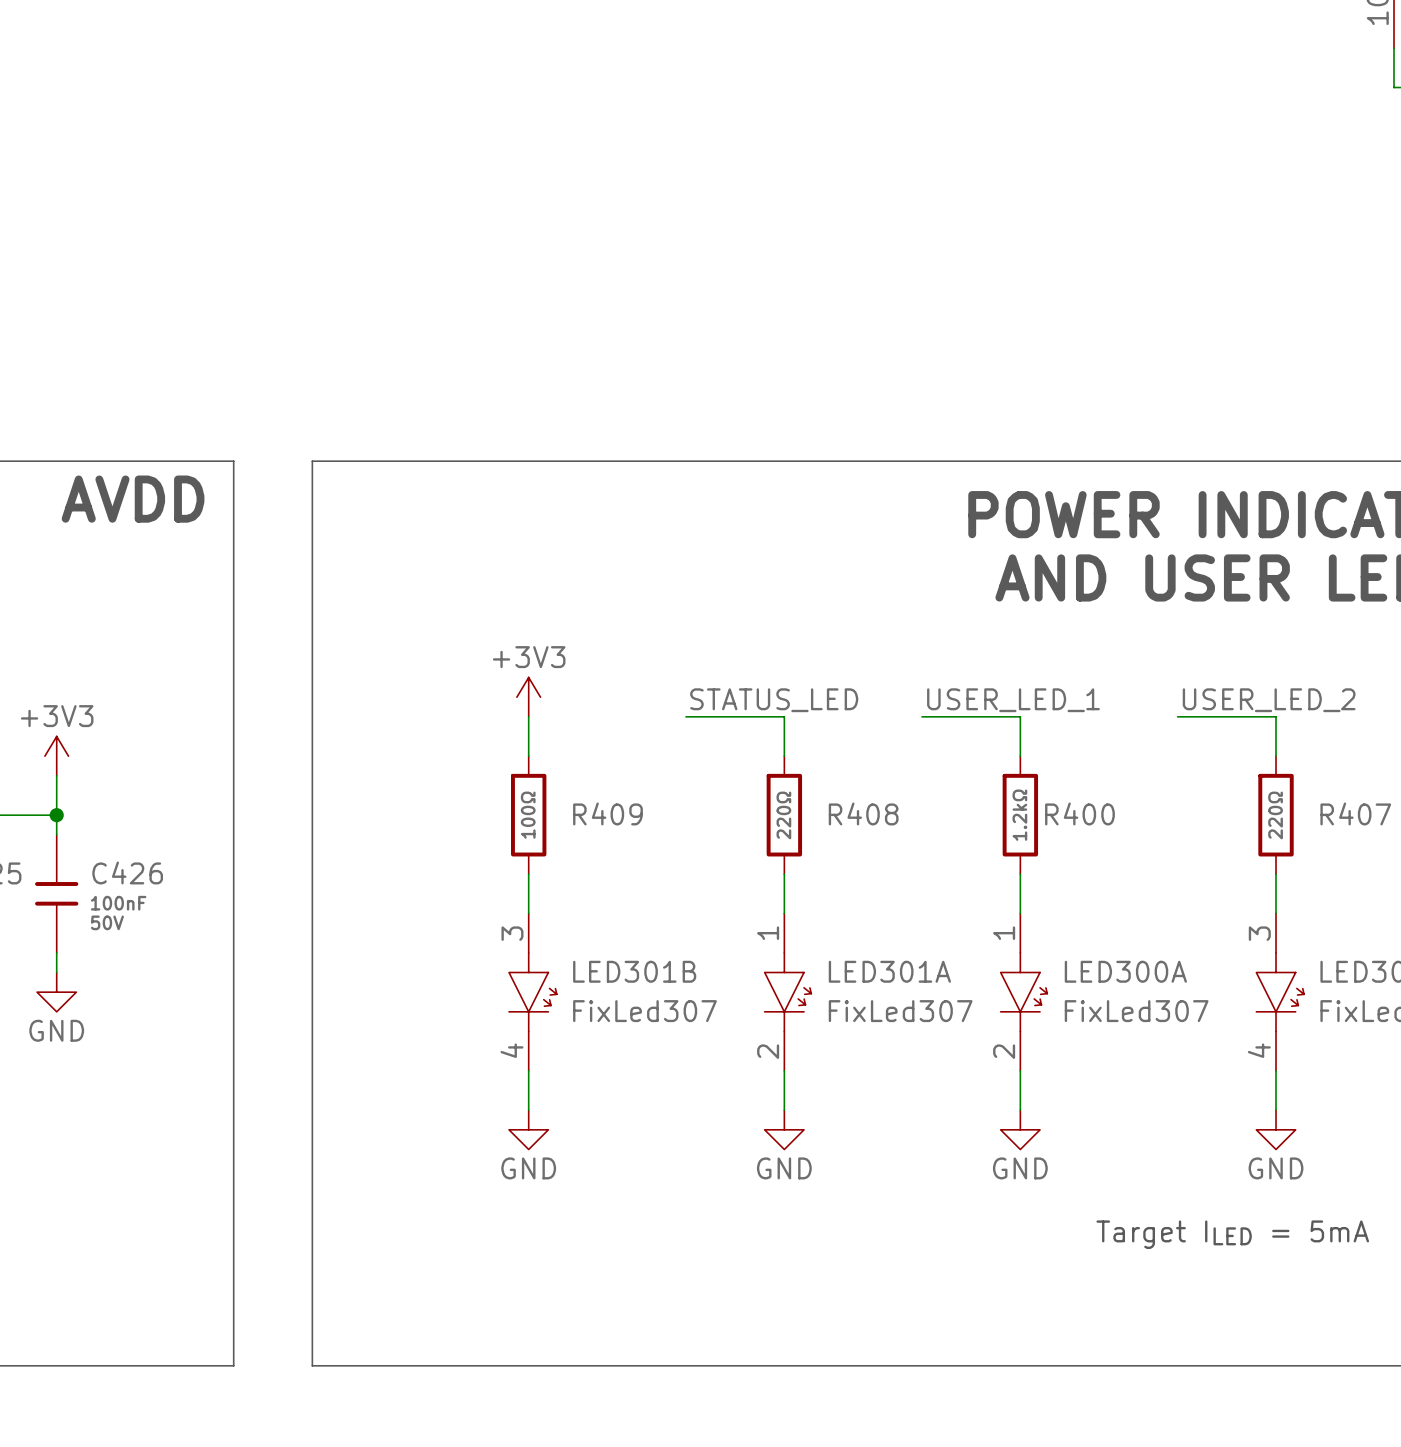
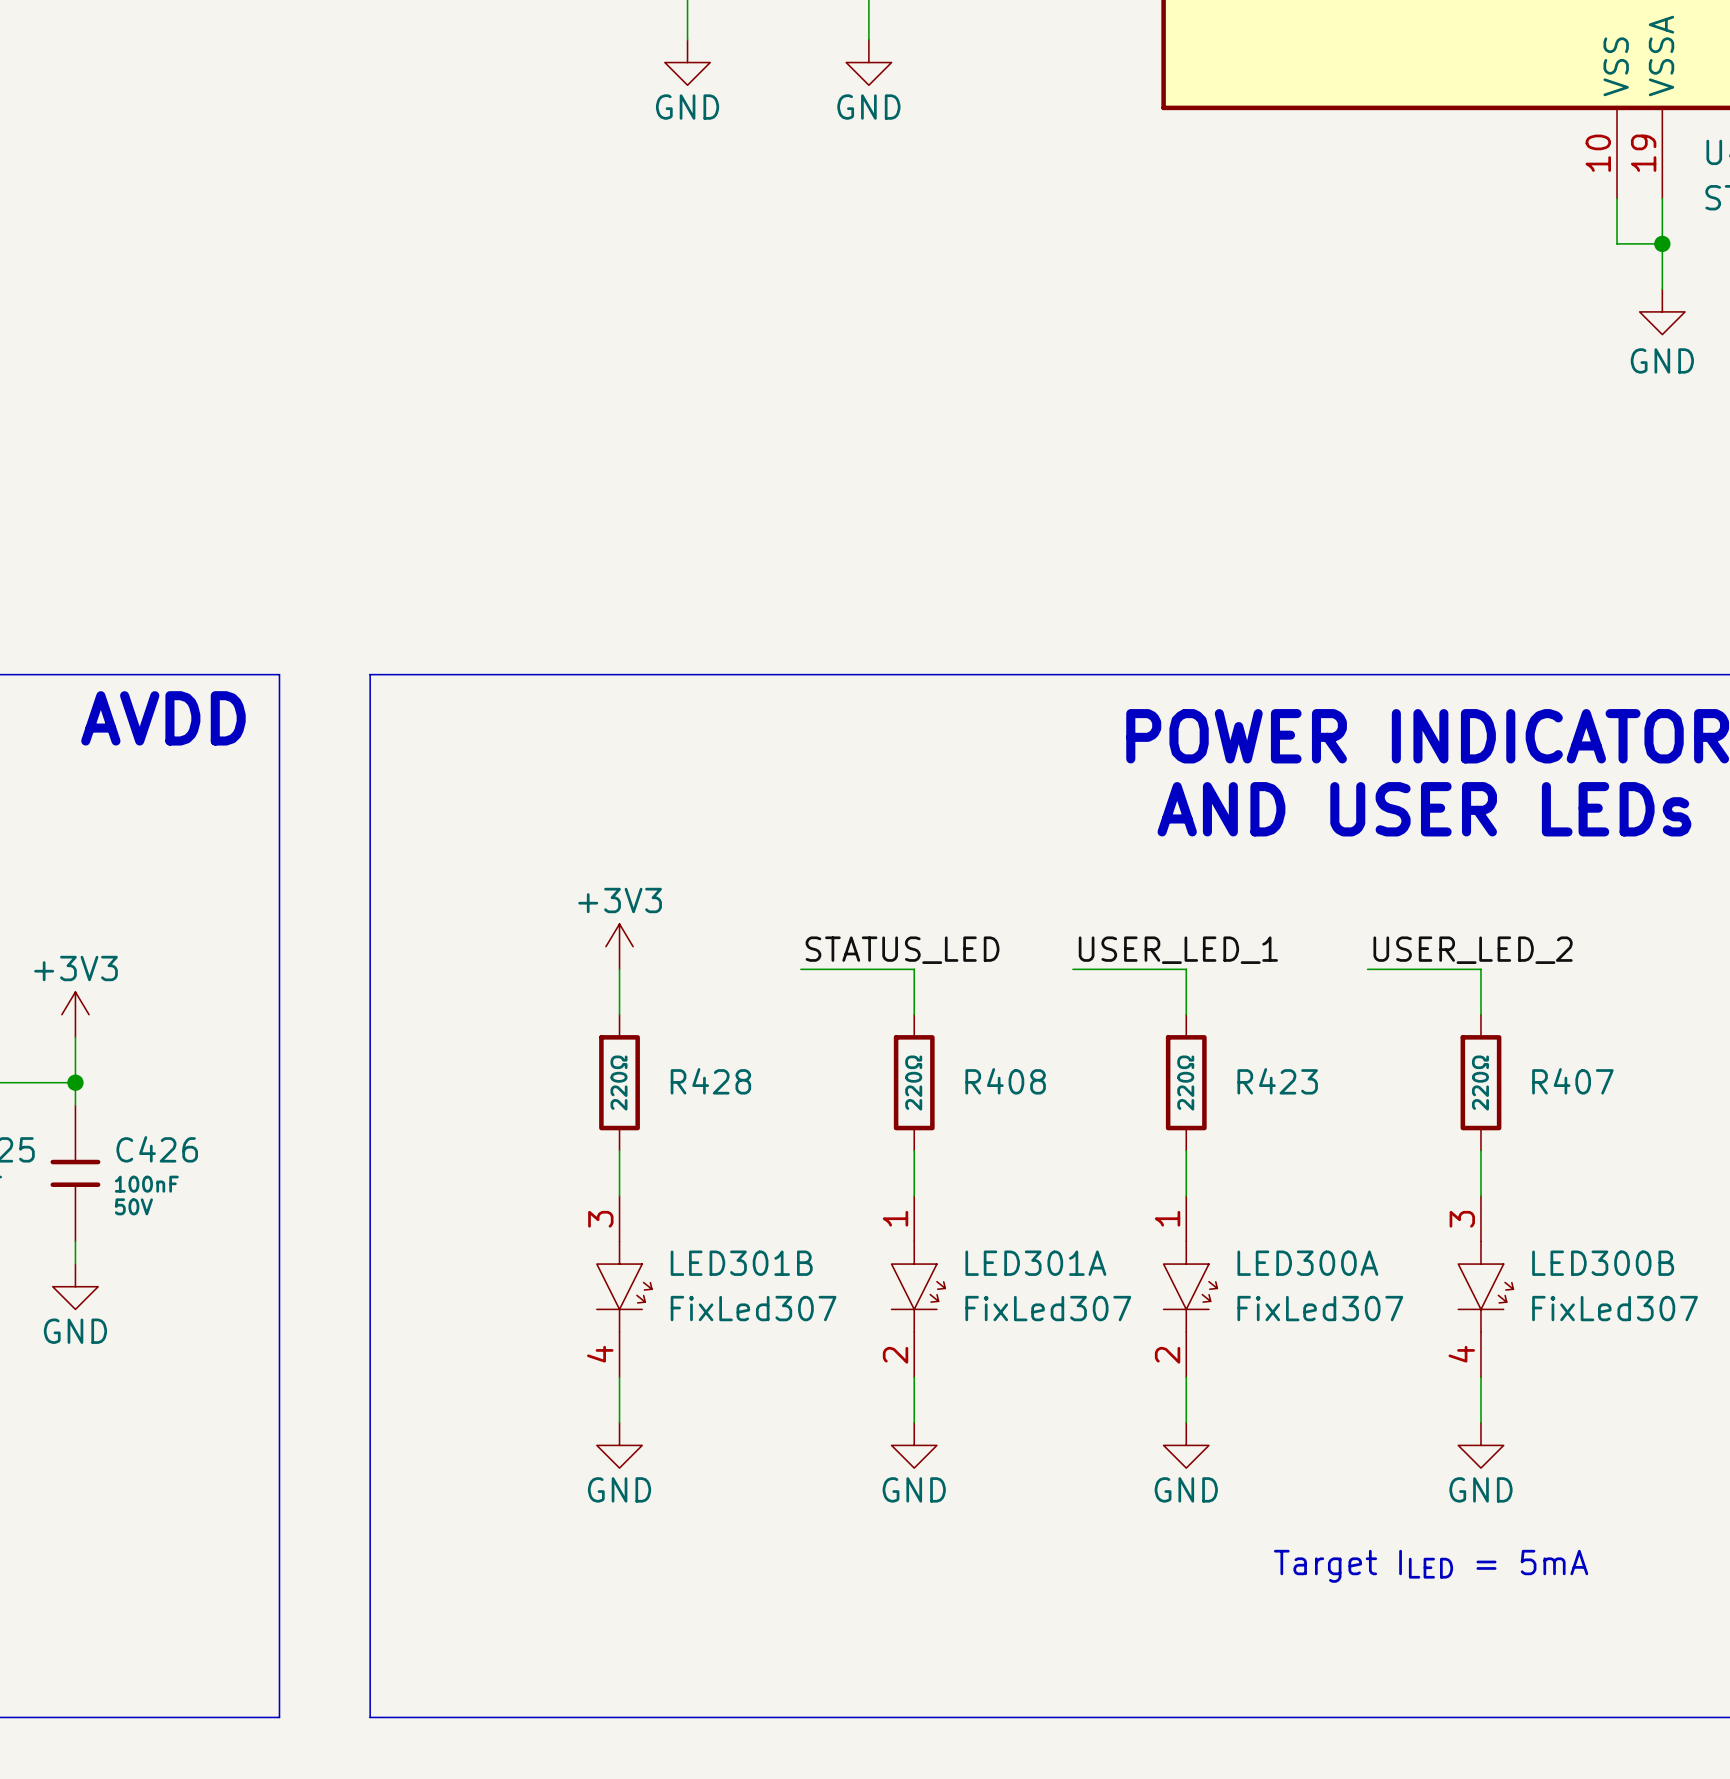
R409 name: R409 (607, 813) -> R428 (710, 1081)
R400 name: R400 (1079, 813) -> R423 (1277, 1081)
R409 value: 100Ω (528, 815) -> 220Ω (618, 1083)
R400 value: 1.2kΩ (1019, 815) -> 220Ω (1185, 1083)

